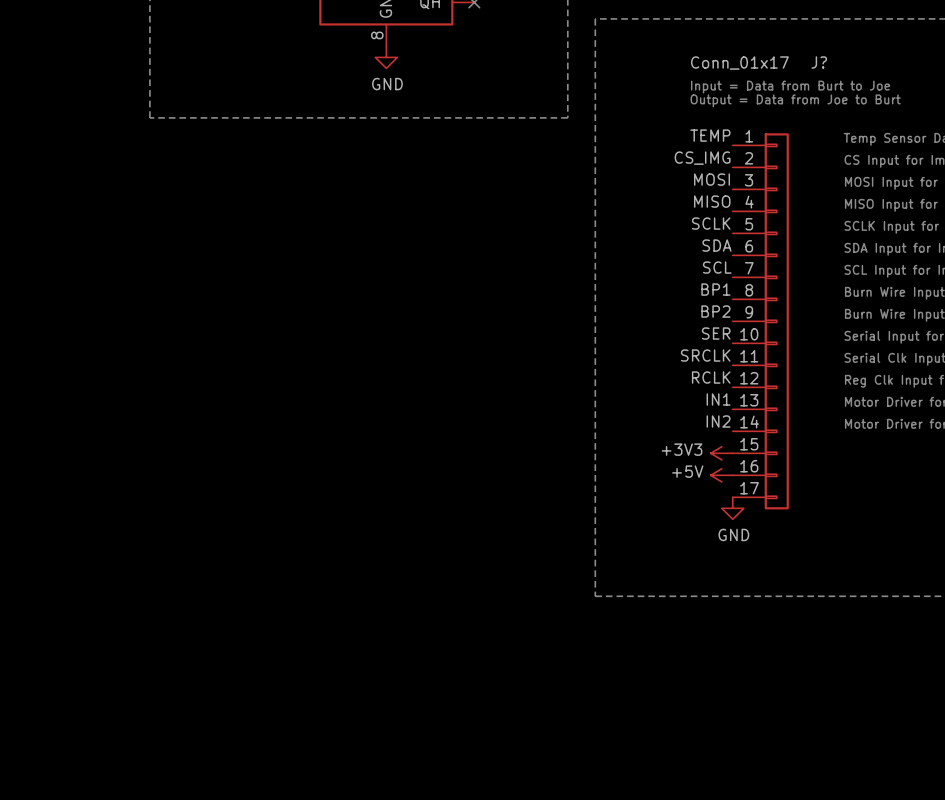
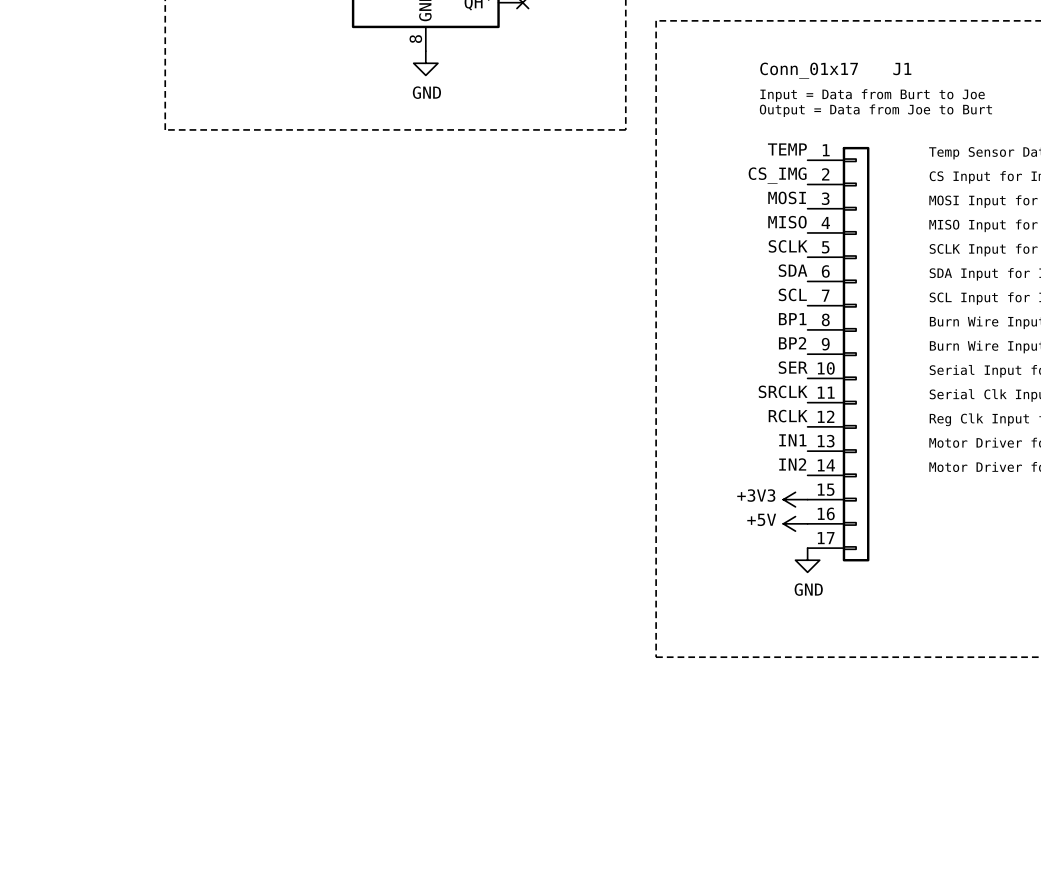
J? name: J? (819, 62) -> J1 (902, 69)

